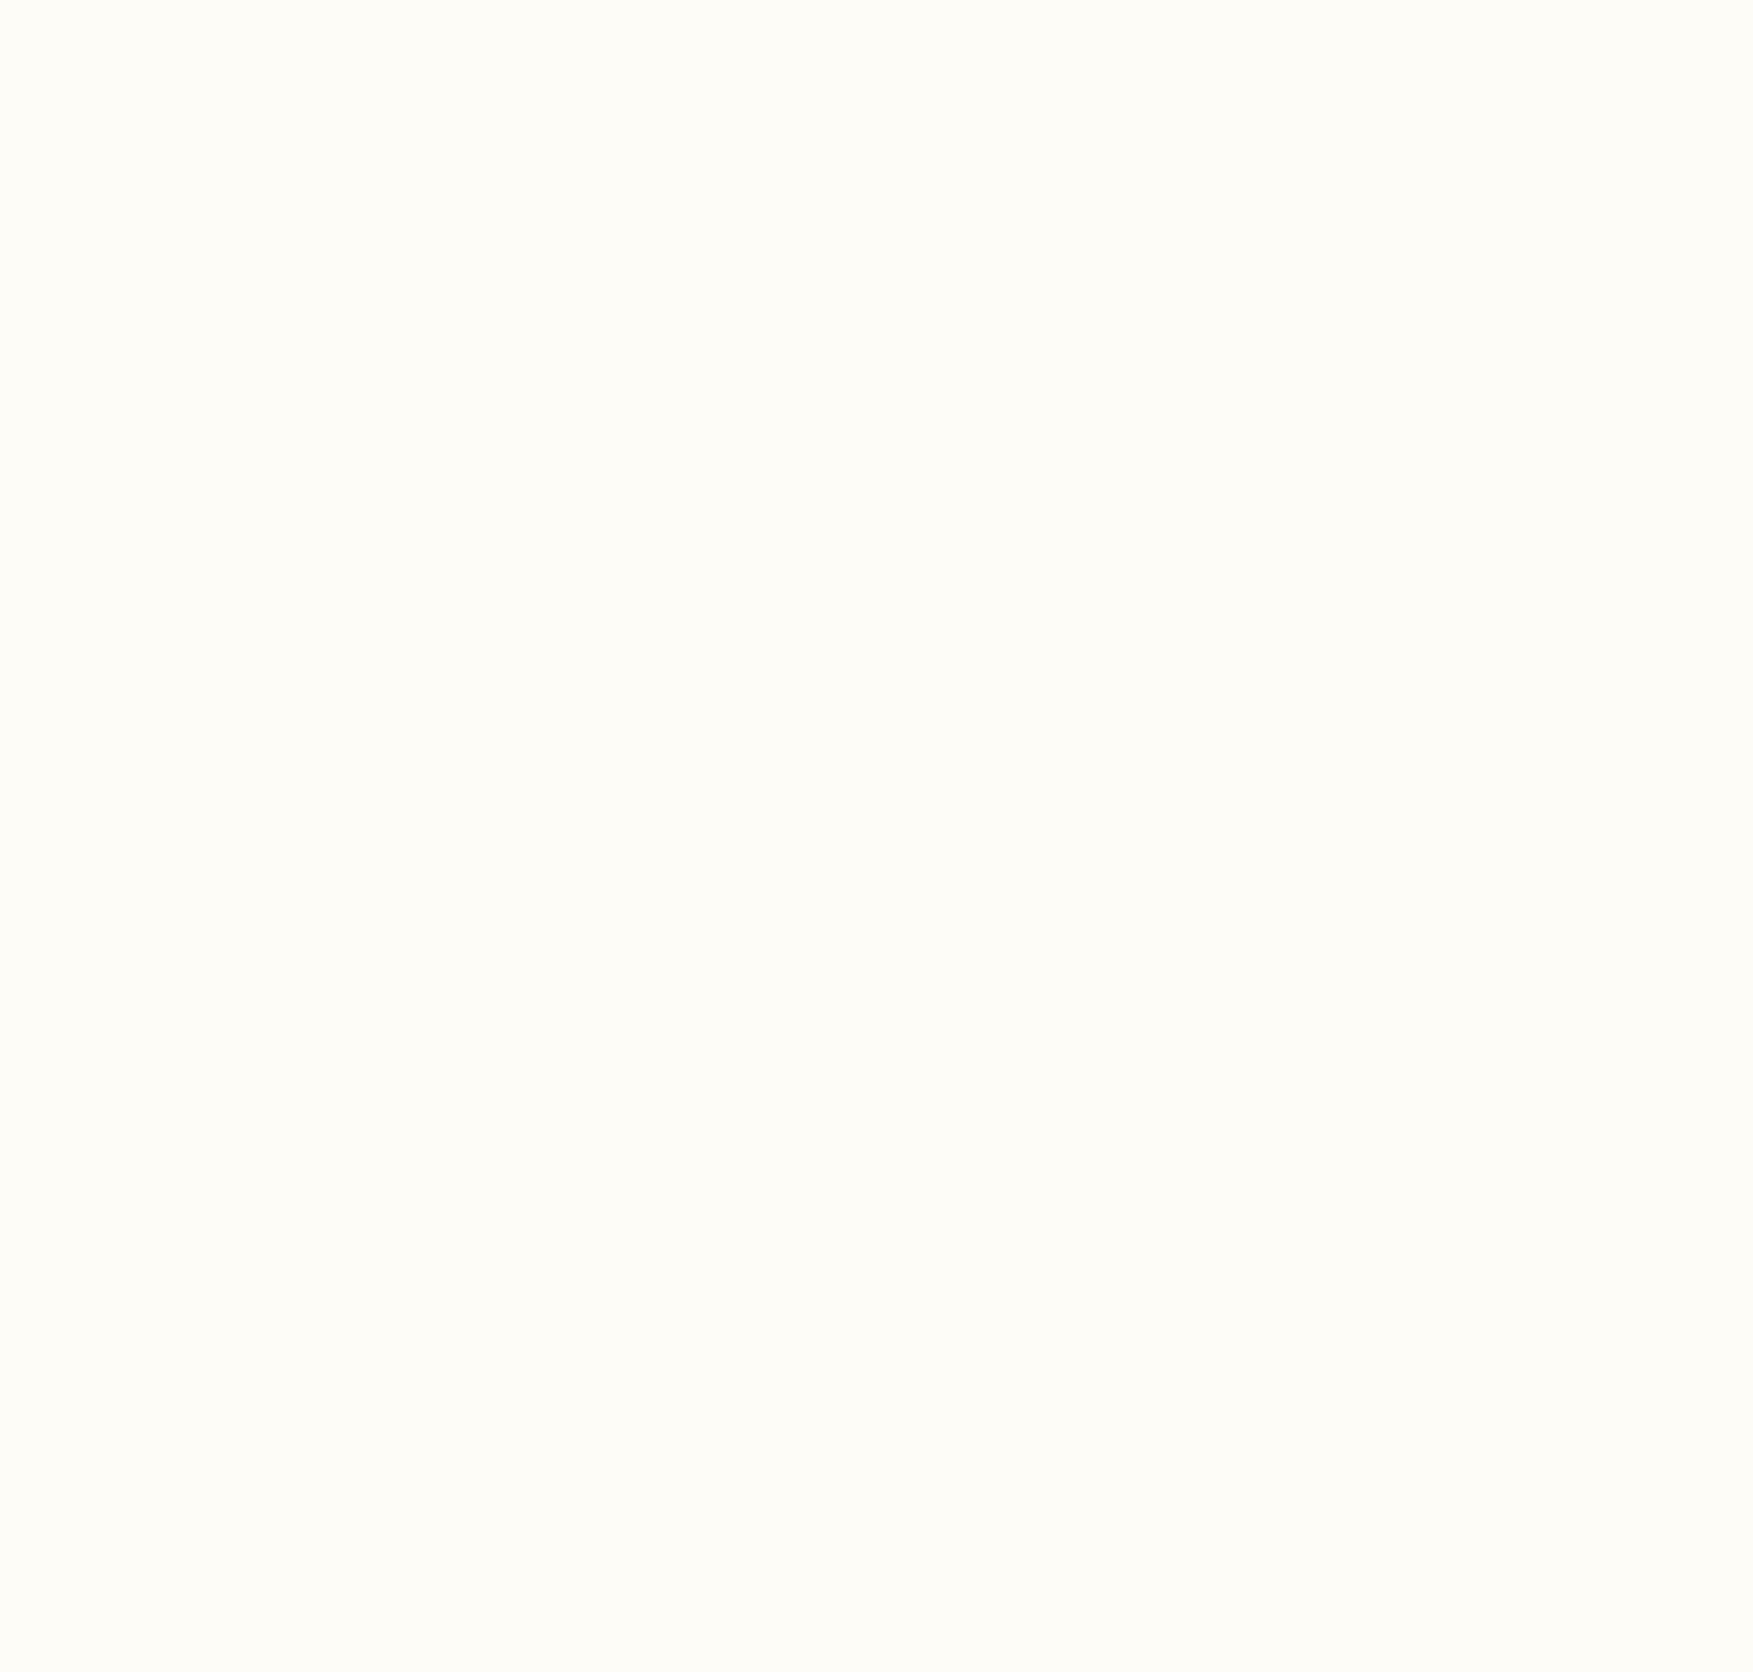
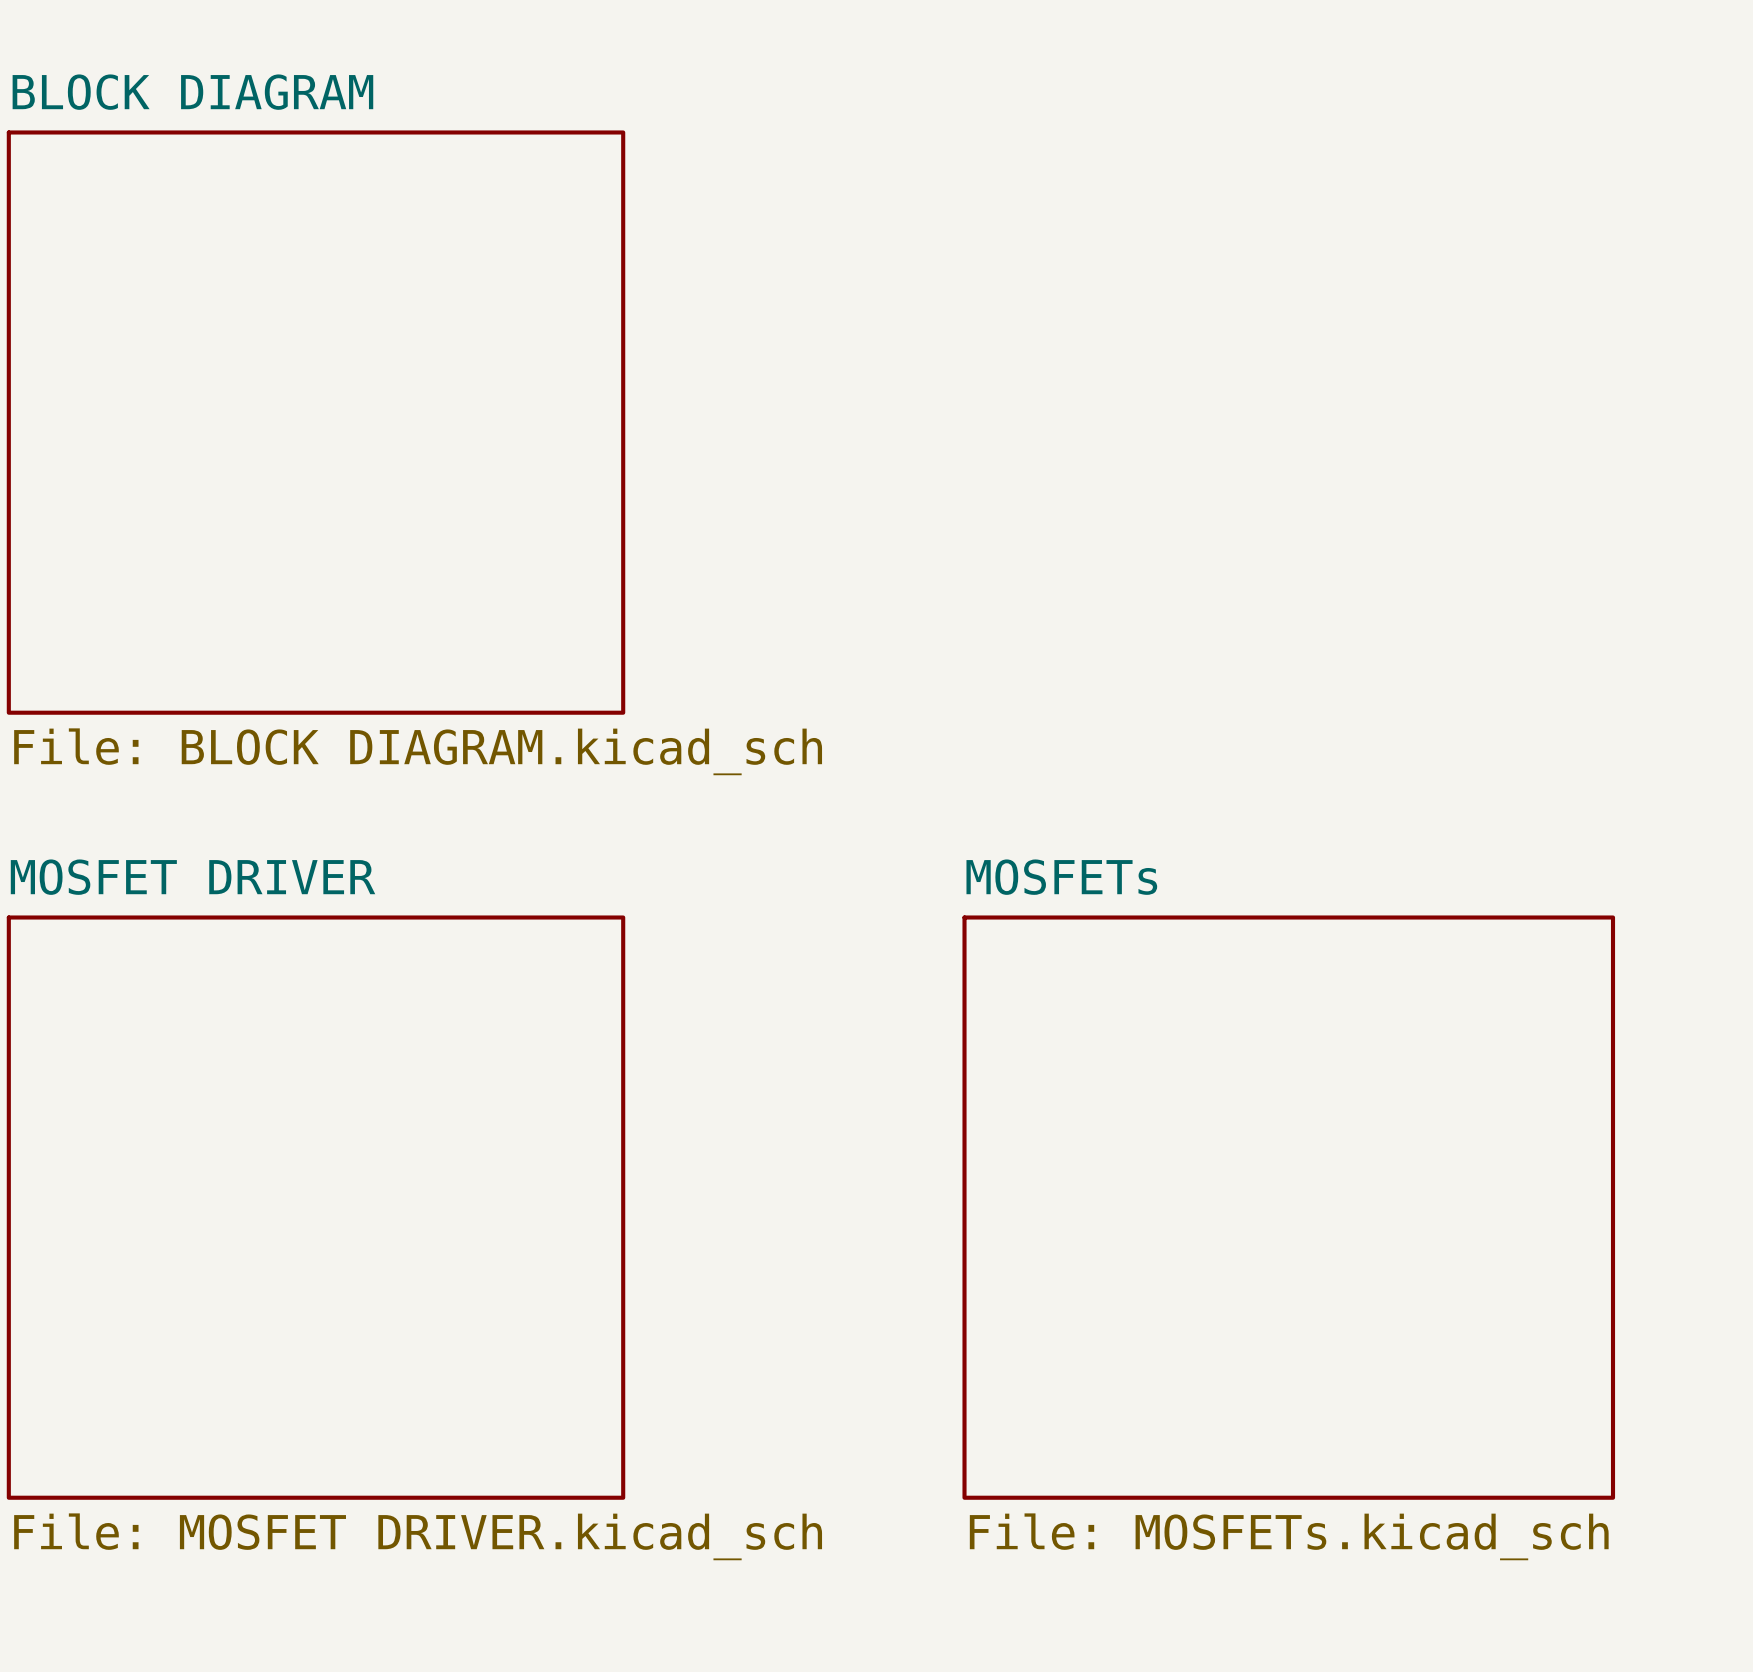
sheet BLOCK DIAGRAM: none -> File: BLOCK DIAGRAM.kicad_sch (316, 422)
sheet MOSFET DRIVER: none -> File: MOSFET DRIVER.kicad_sch (316, 1207)
sheet MOSFETs: none -> File: MOSFETs.kicad_sch (1288, 1207)

